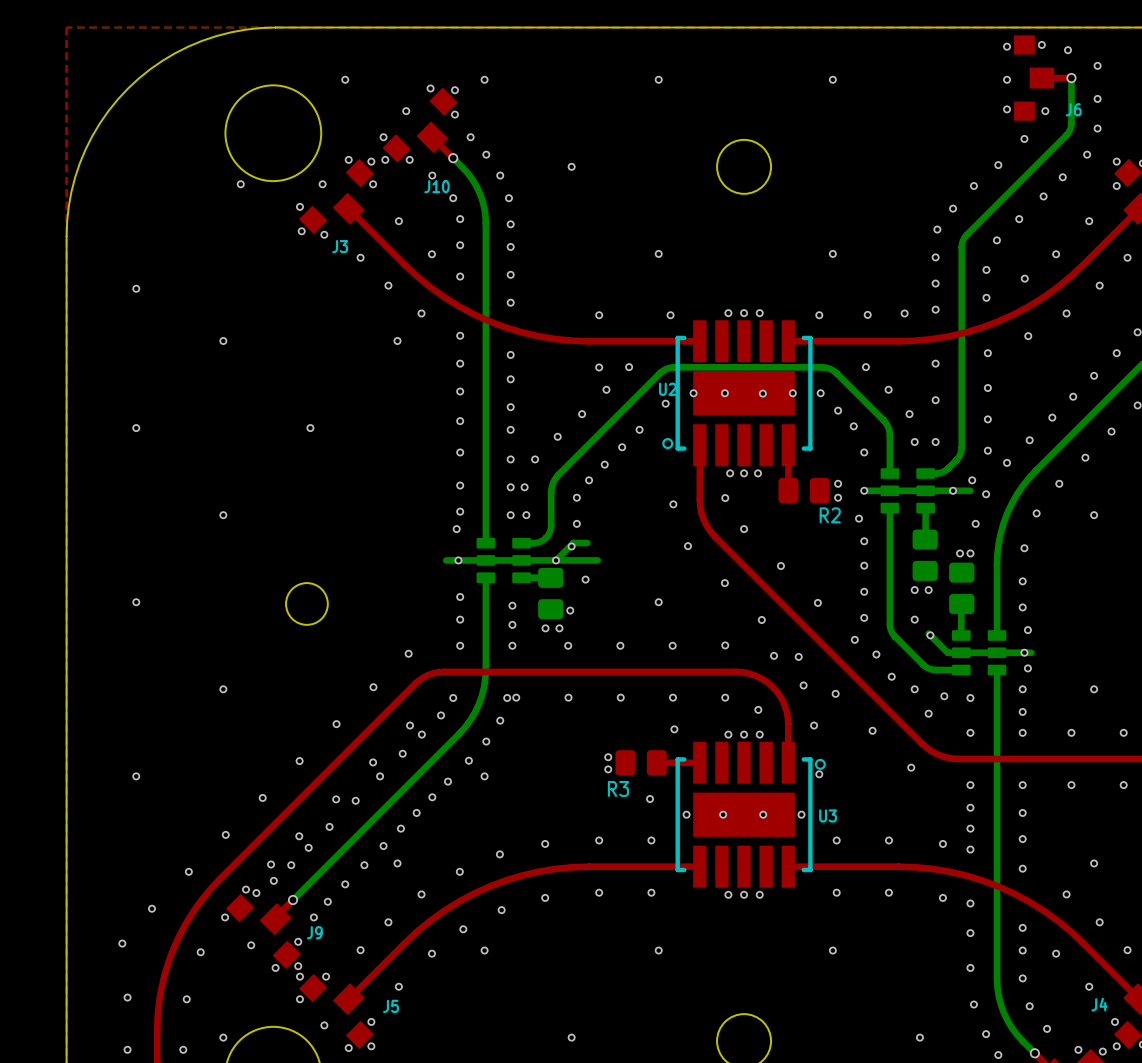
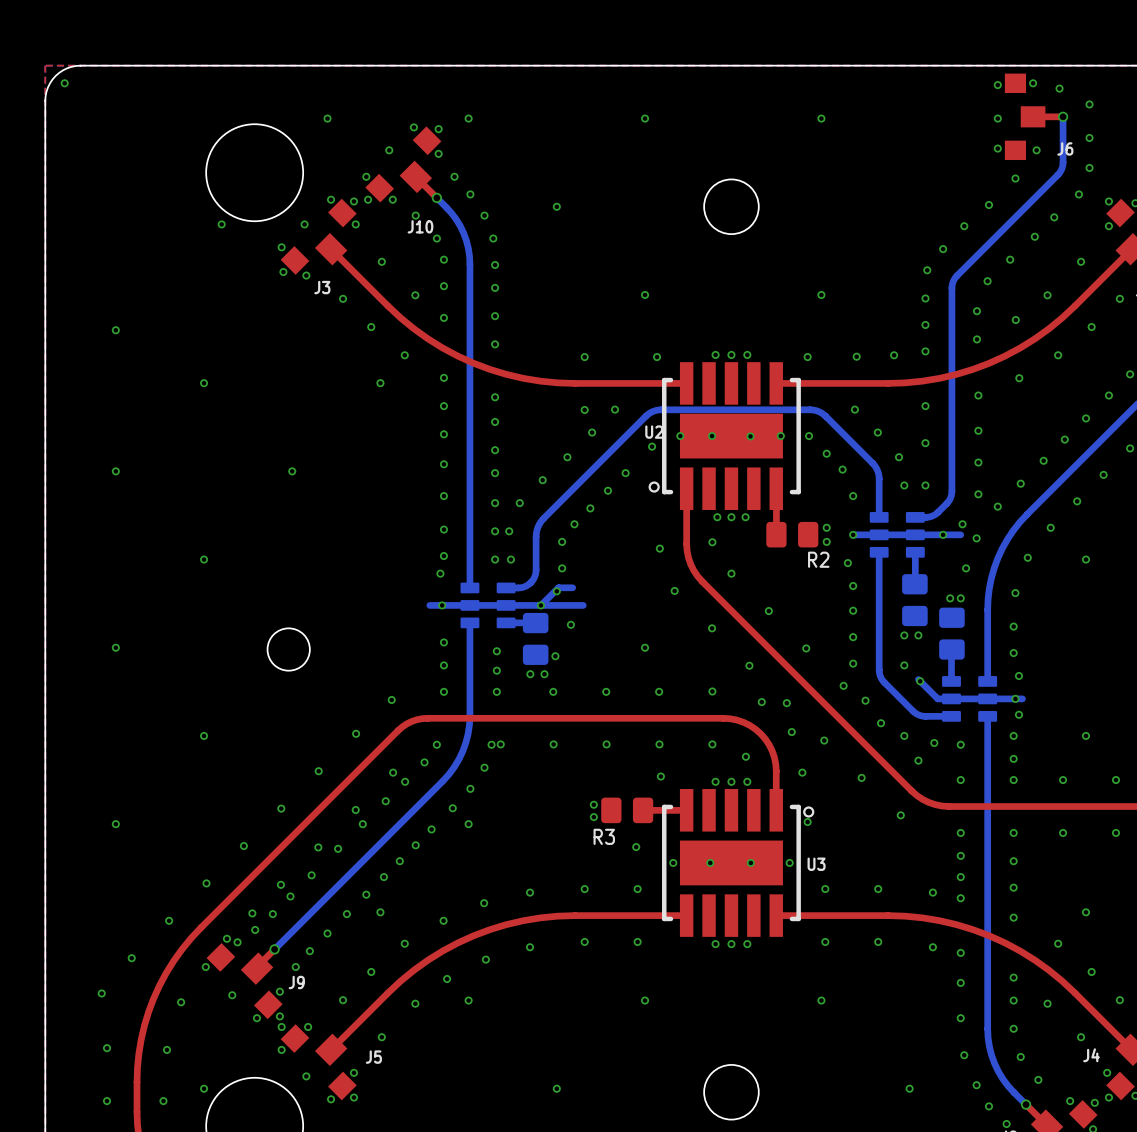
board edge: (275, 27) (231, 32) (188, 46) (150, 69) (127, 88) (108, 111) (85, 149) (71, 192) (66, 236) -> (256, 65) (80, 65) (67, 68) (55, 75) (47, 87) (45, 100) (45, 277)
via: none -> (64, 83)

